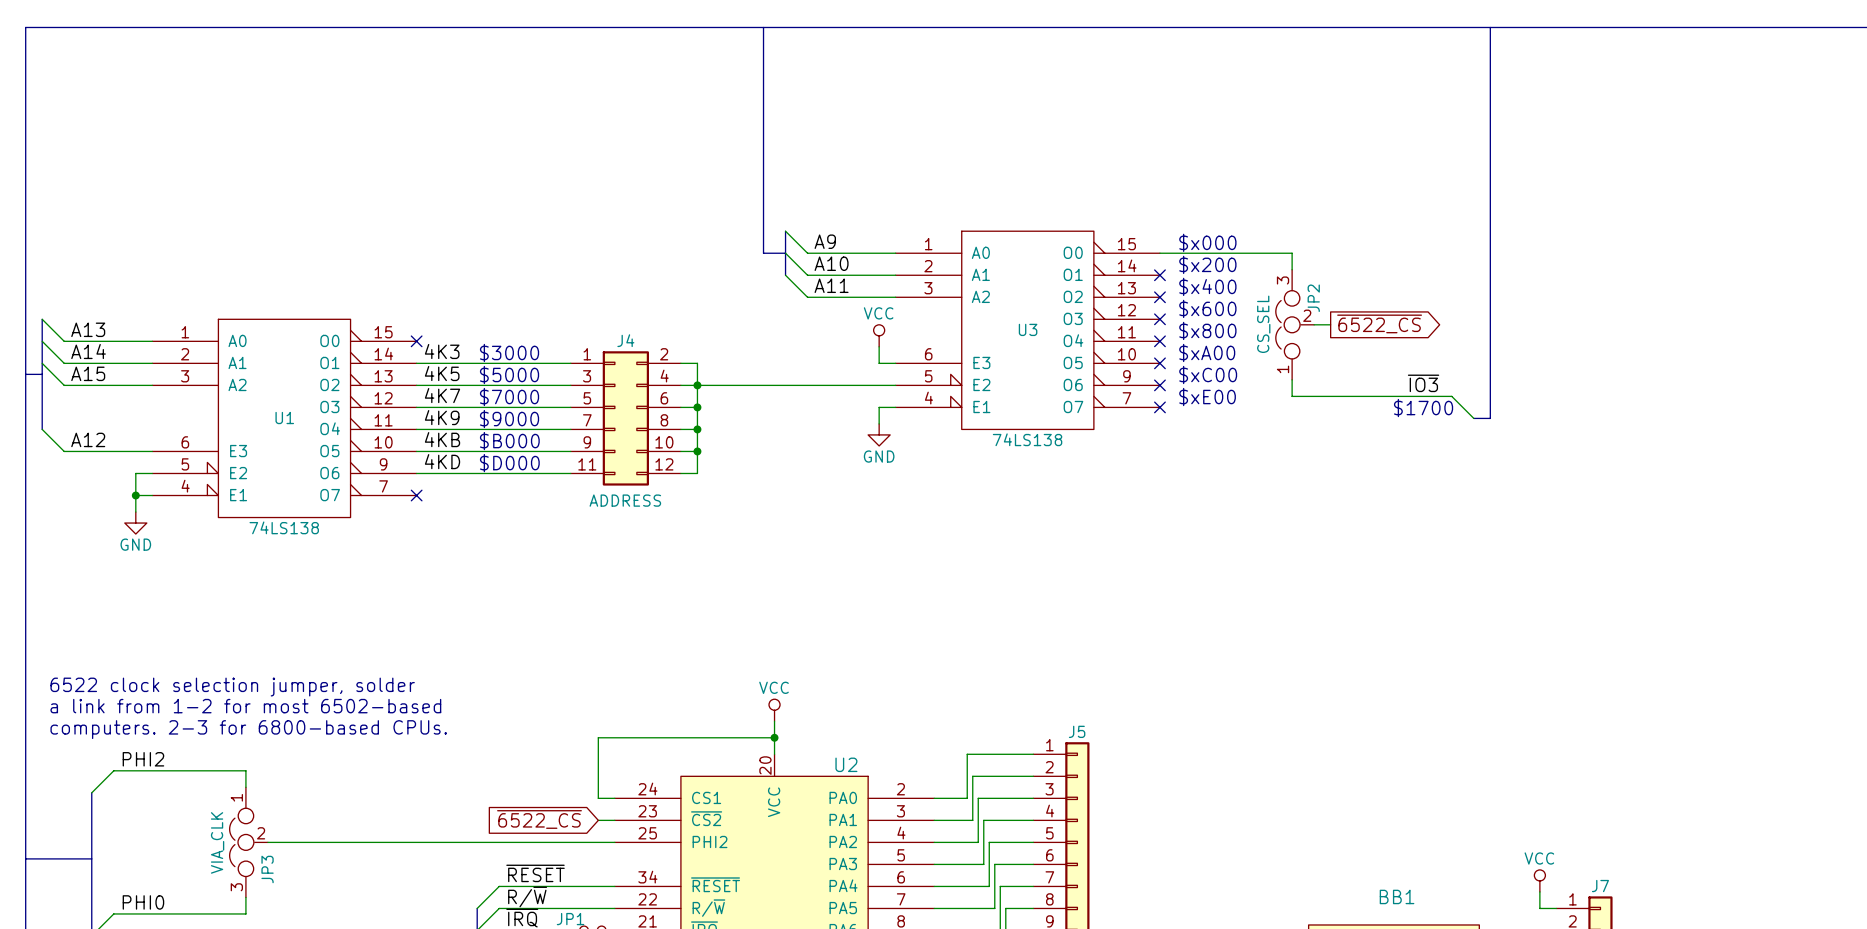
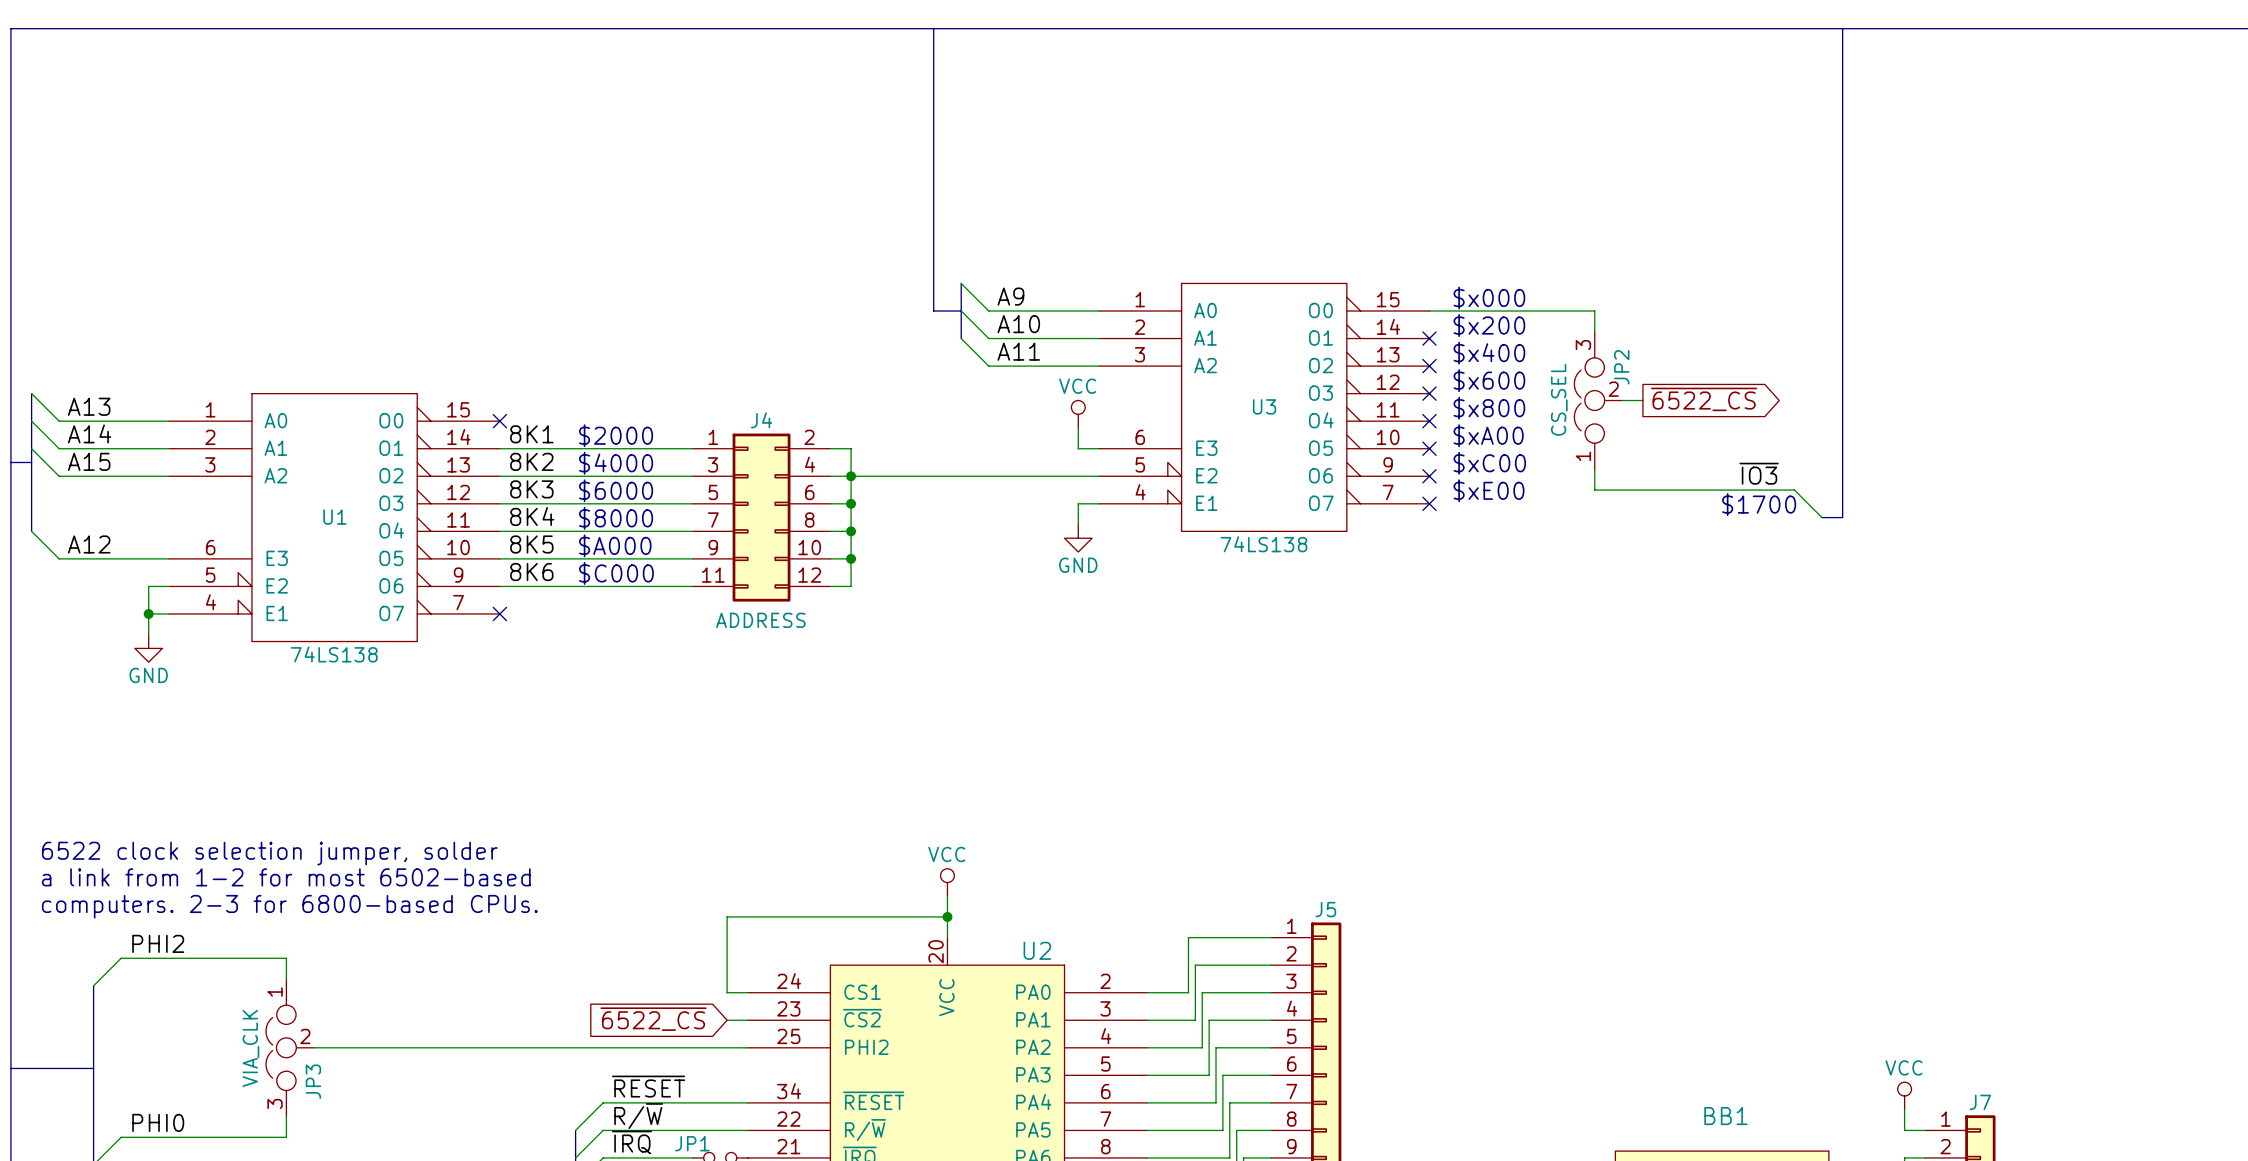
label: 4K3 (442, 351) -> 8K1 (531, 434)
text: $3000 (509, 352) -> $2000 (616, 435)
label: 4K5 (442, 373) -> 8K2 (531, 461)
text: $5000 (509, 374) -> $4000 (616, 463)
label: 4K7 (442, 395) -> 8K3 (531, 489)
text: $7000 (509, 397) -> $6000 (616, 490)
label: 4K9 (442, 417) -> 8K4 (532, 516)
text: $9000 (509, 419) -> $8000 (616, 518)
label: 4KB (442, 439) -> 8K5 (531, 544)
text: $B000 (509, 441) -> $A000 (615, 545)
label: 4KD (442, 461) -> 8K6 (531, 572)
text: $D000 (509, 463) -> $C000 (616, 573)

